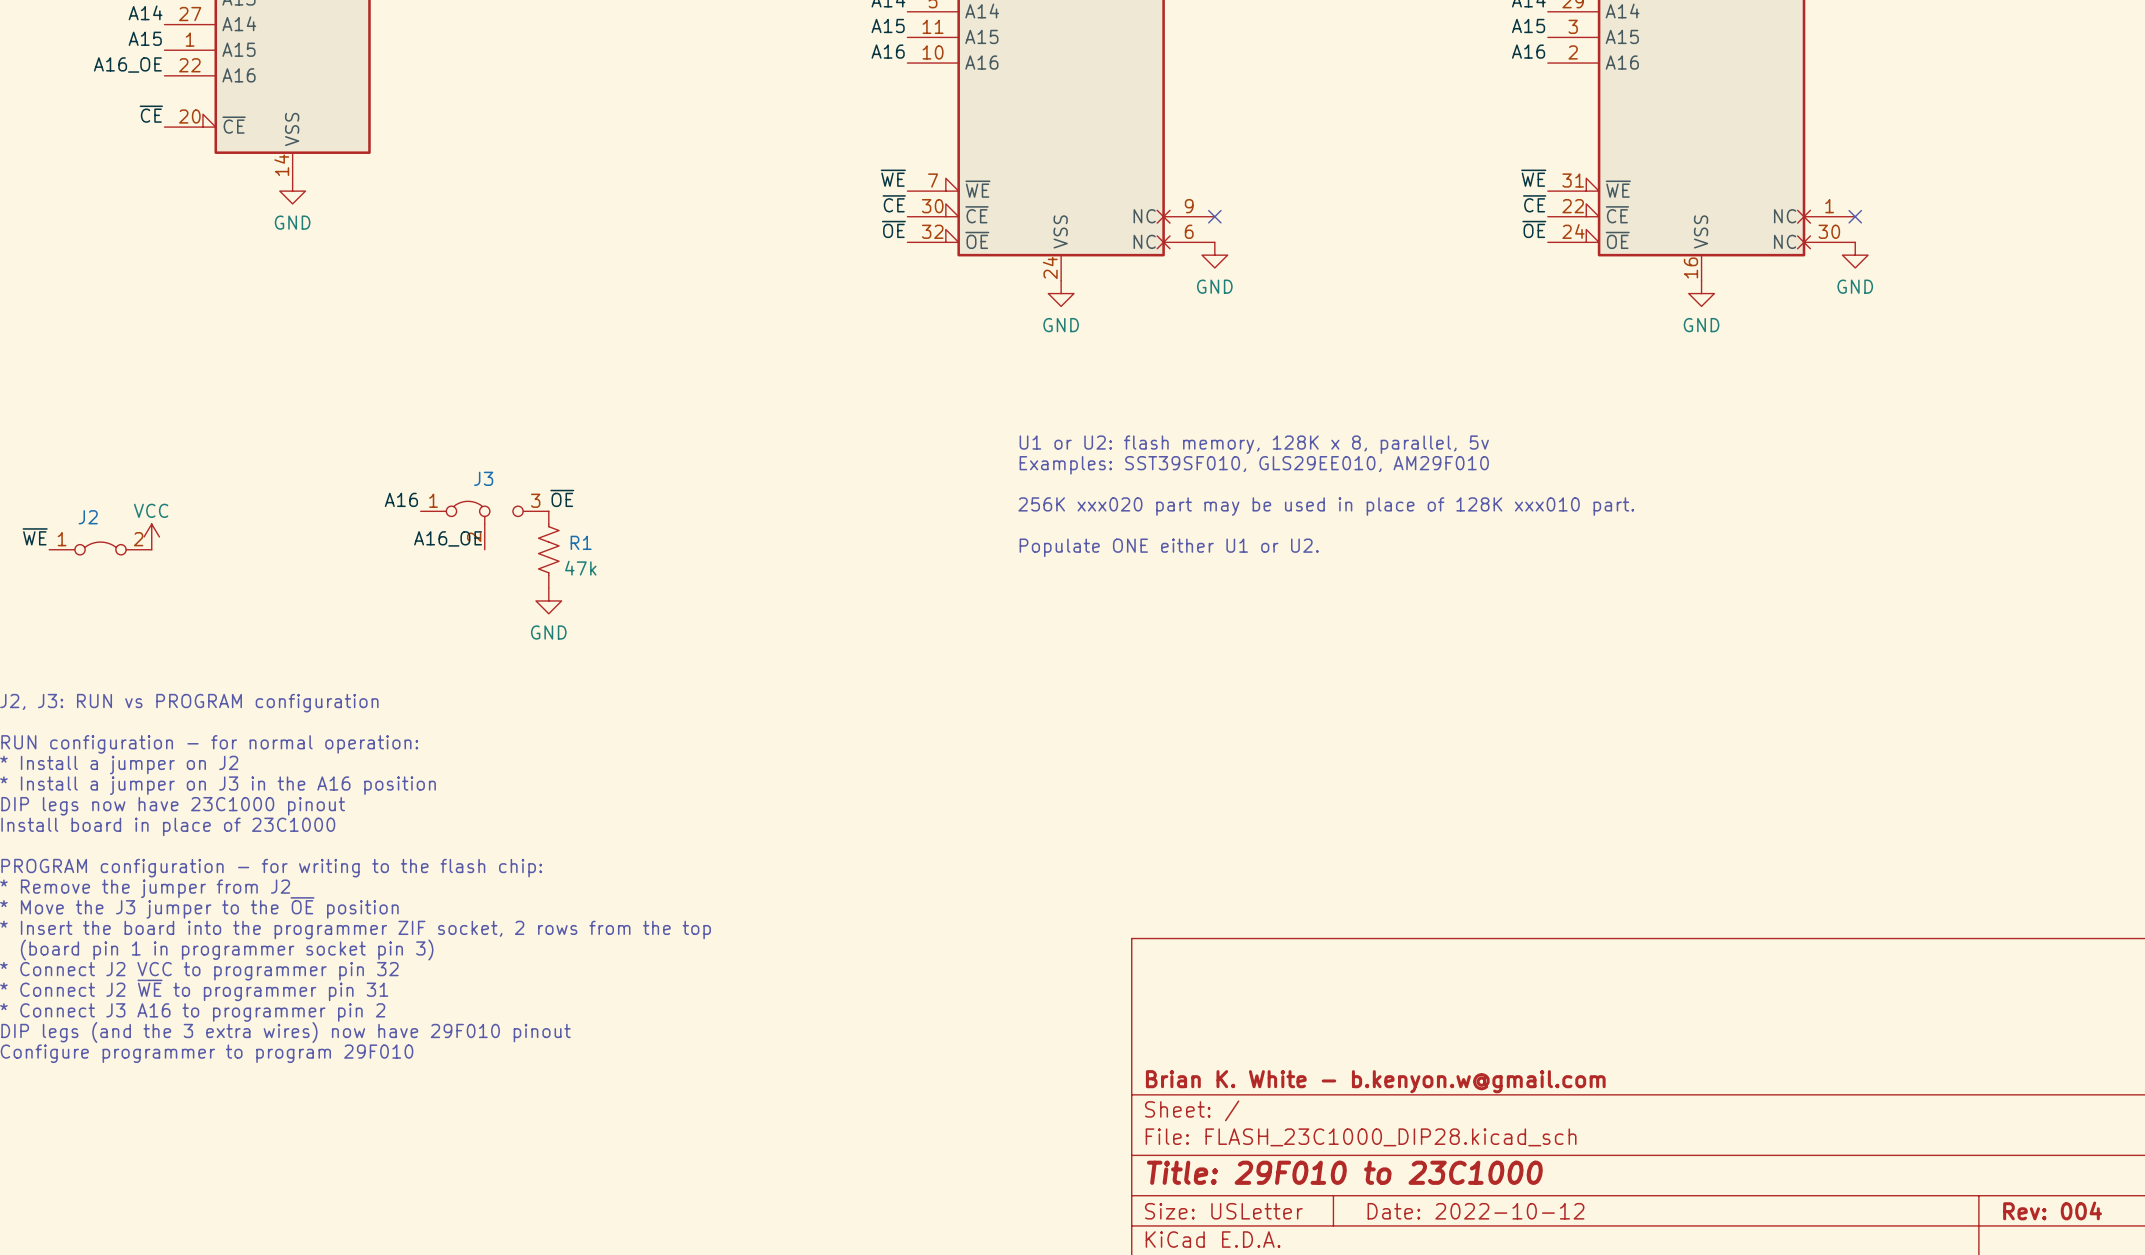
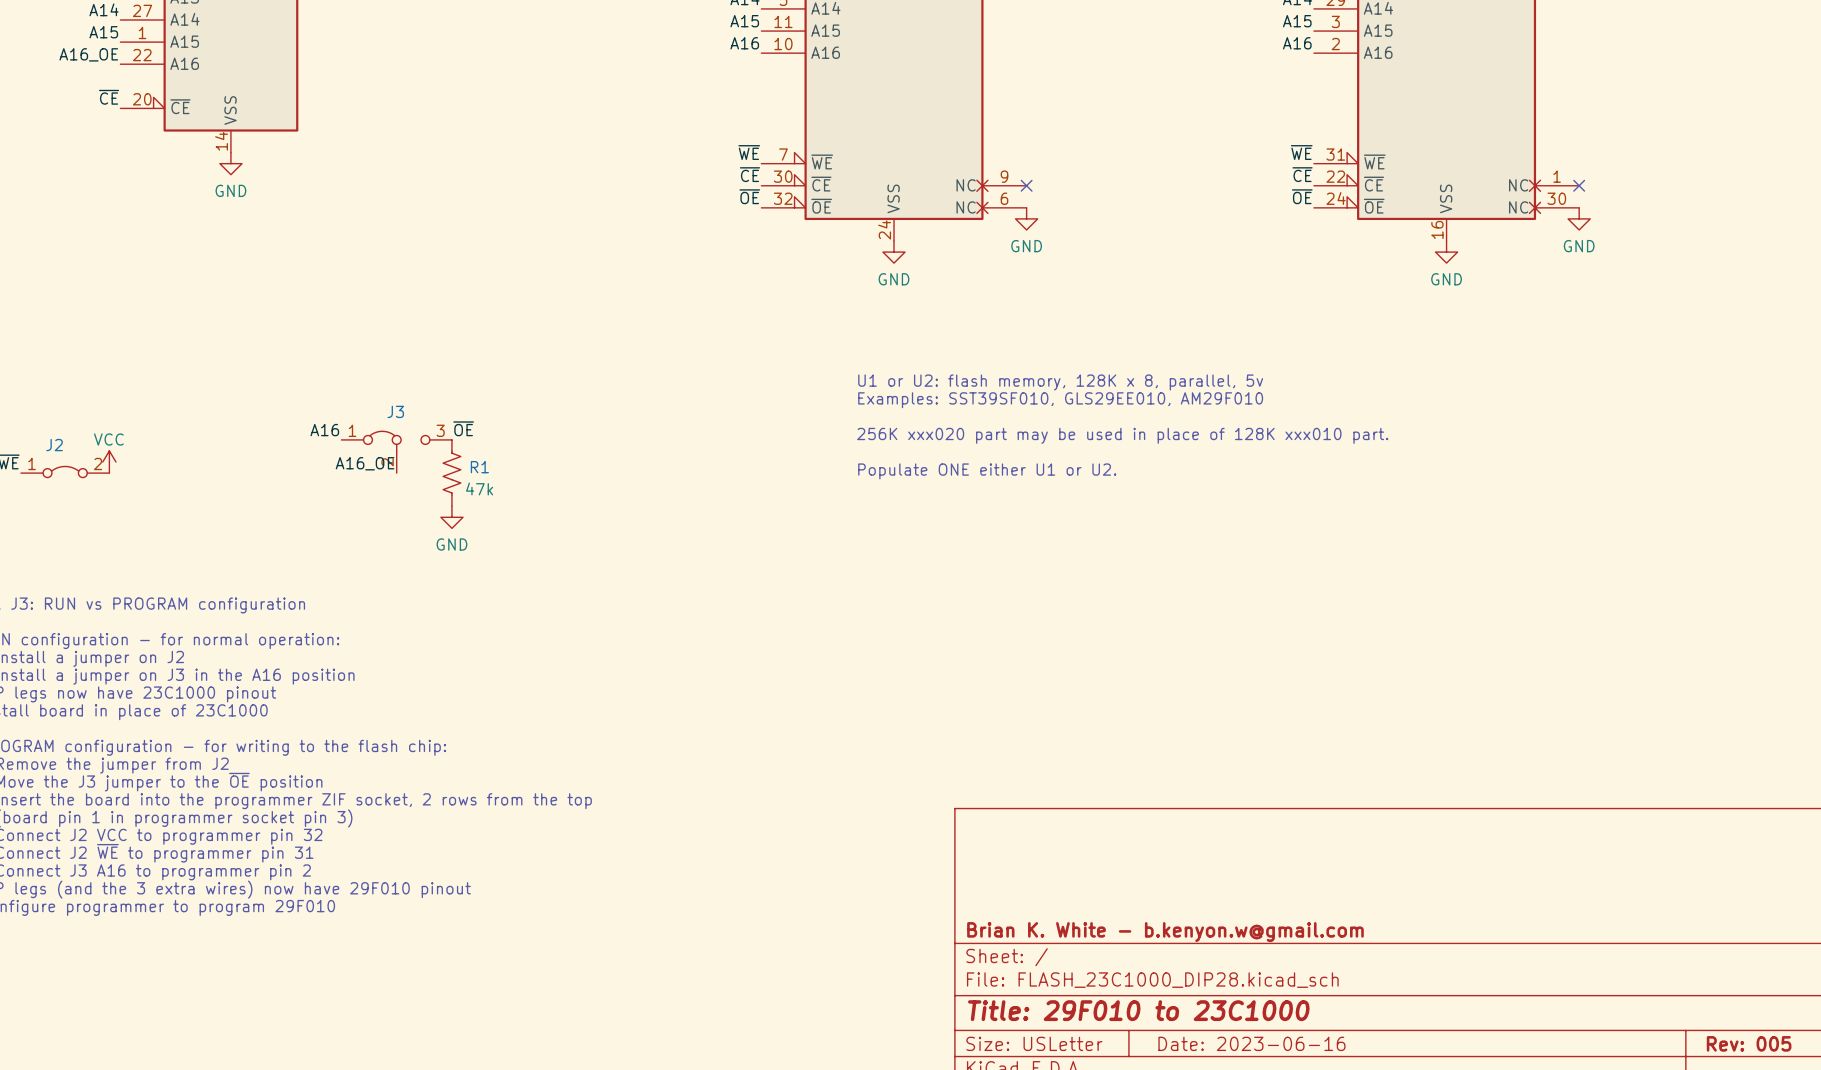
title block: Rev: 004 (2052, 1210) -> Rev: 005 (1749, 1043)
title block: Date: 2022-10-12 (1476, 1211) -> Date: 2023-06-16 (1251, 1043)

